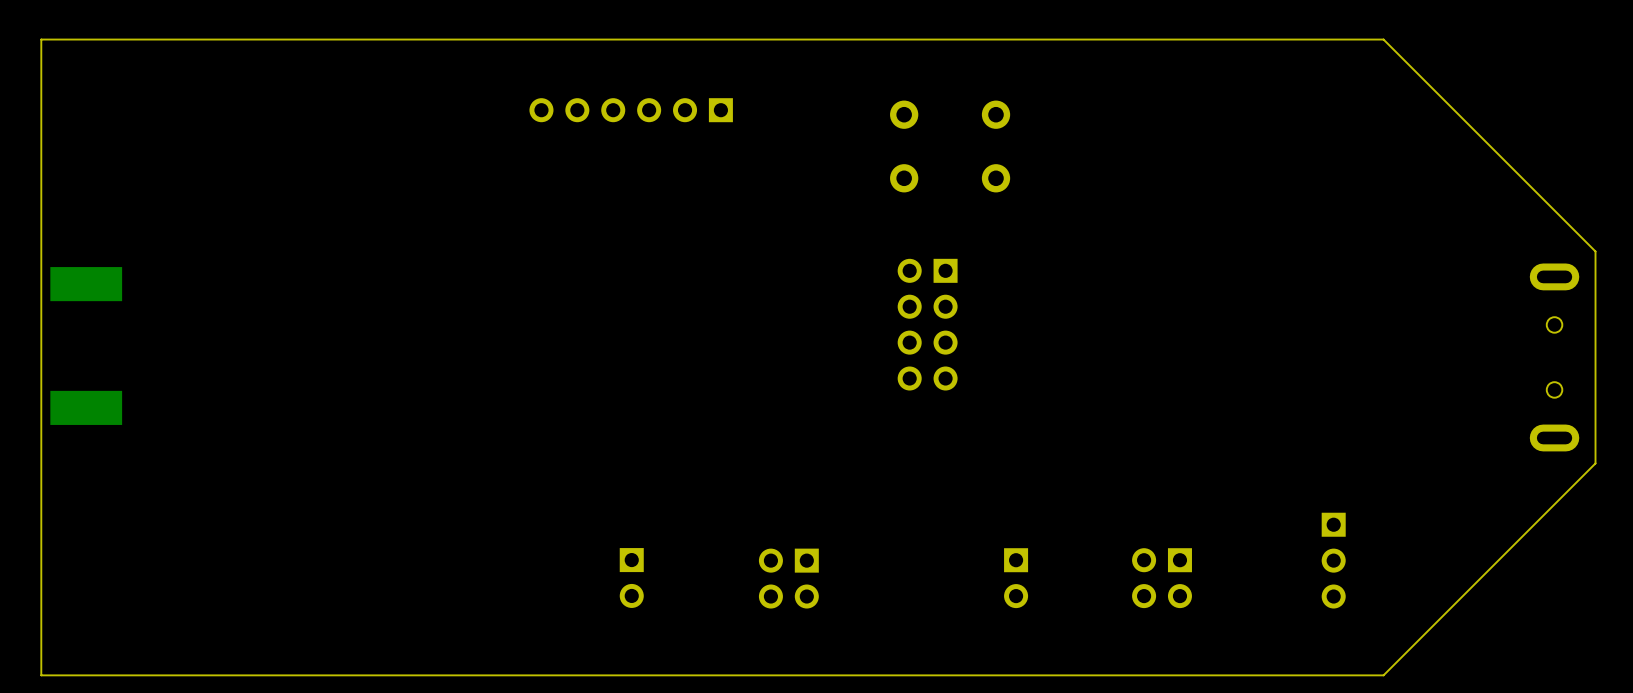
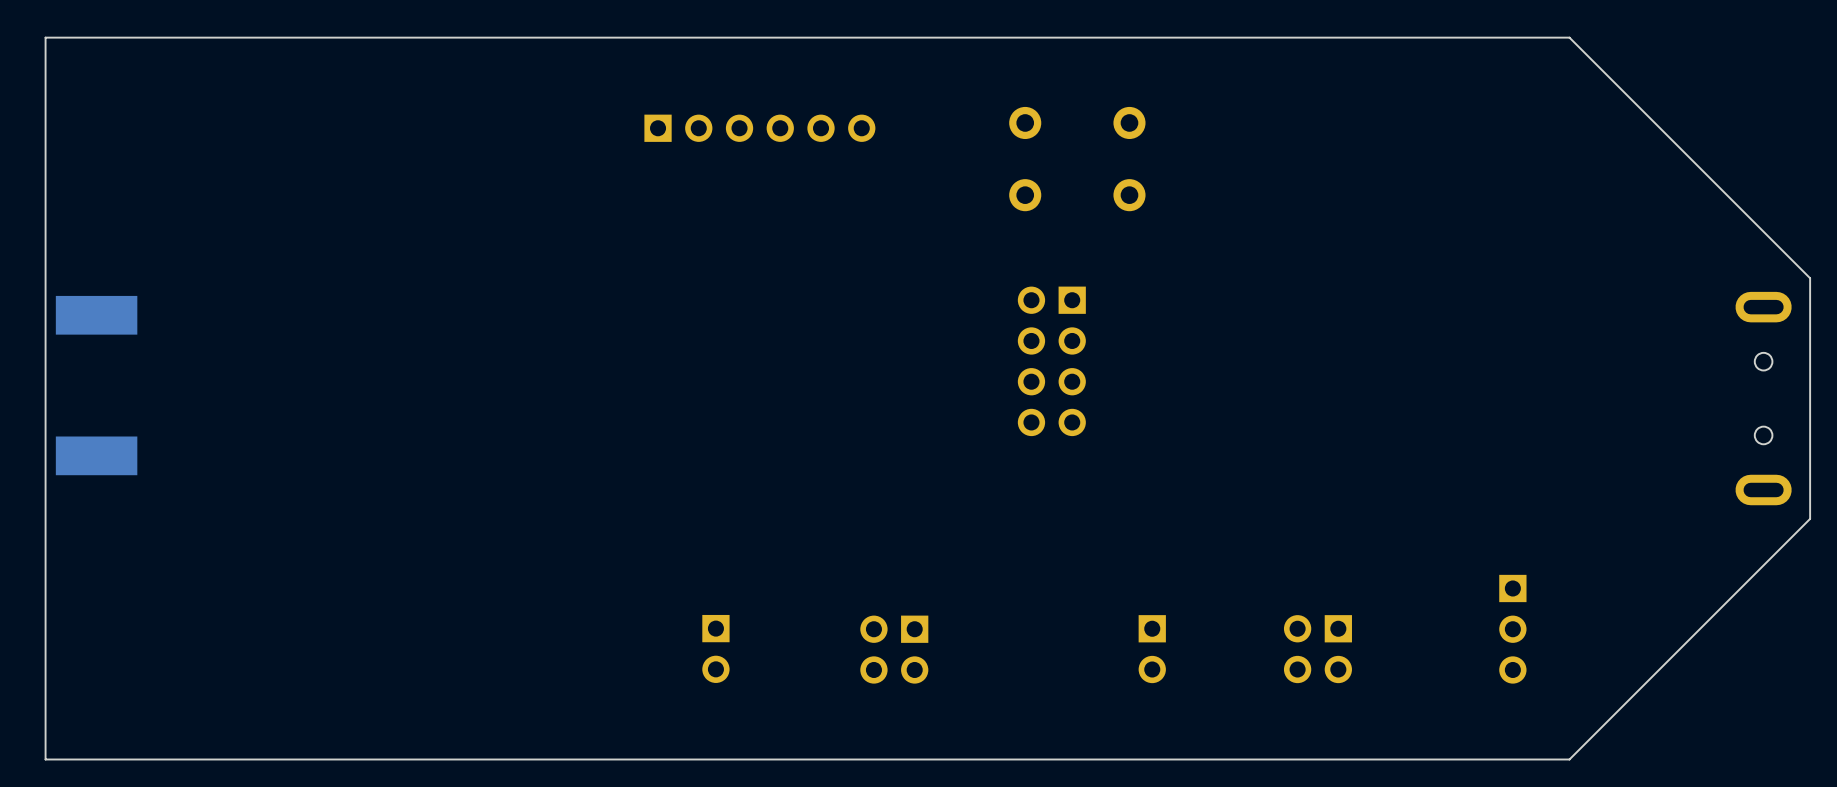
part rotation: 0° (631, 110) -> 180° (759, 128)

